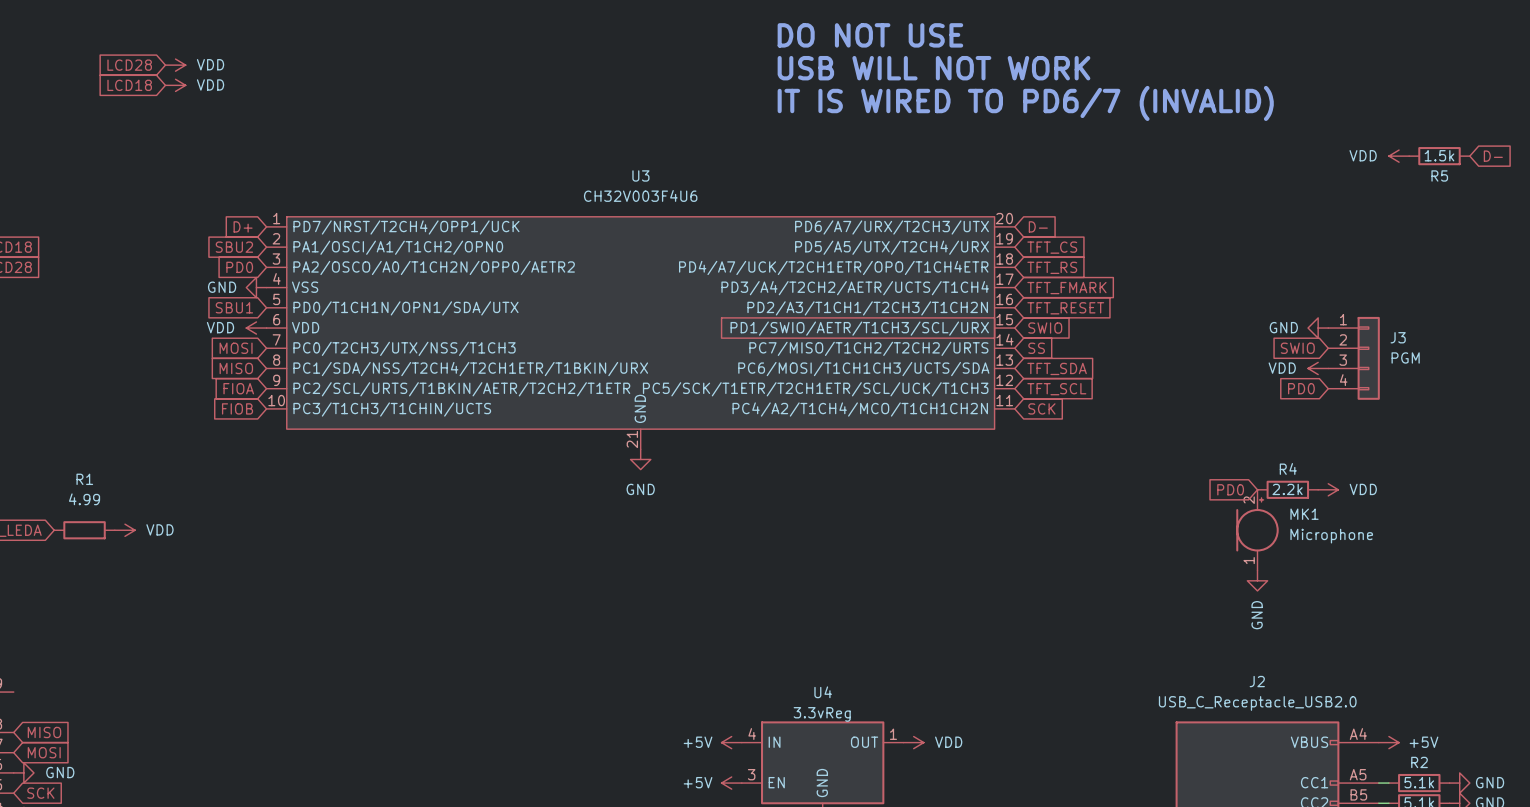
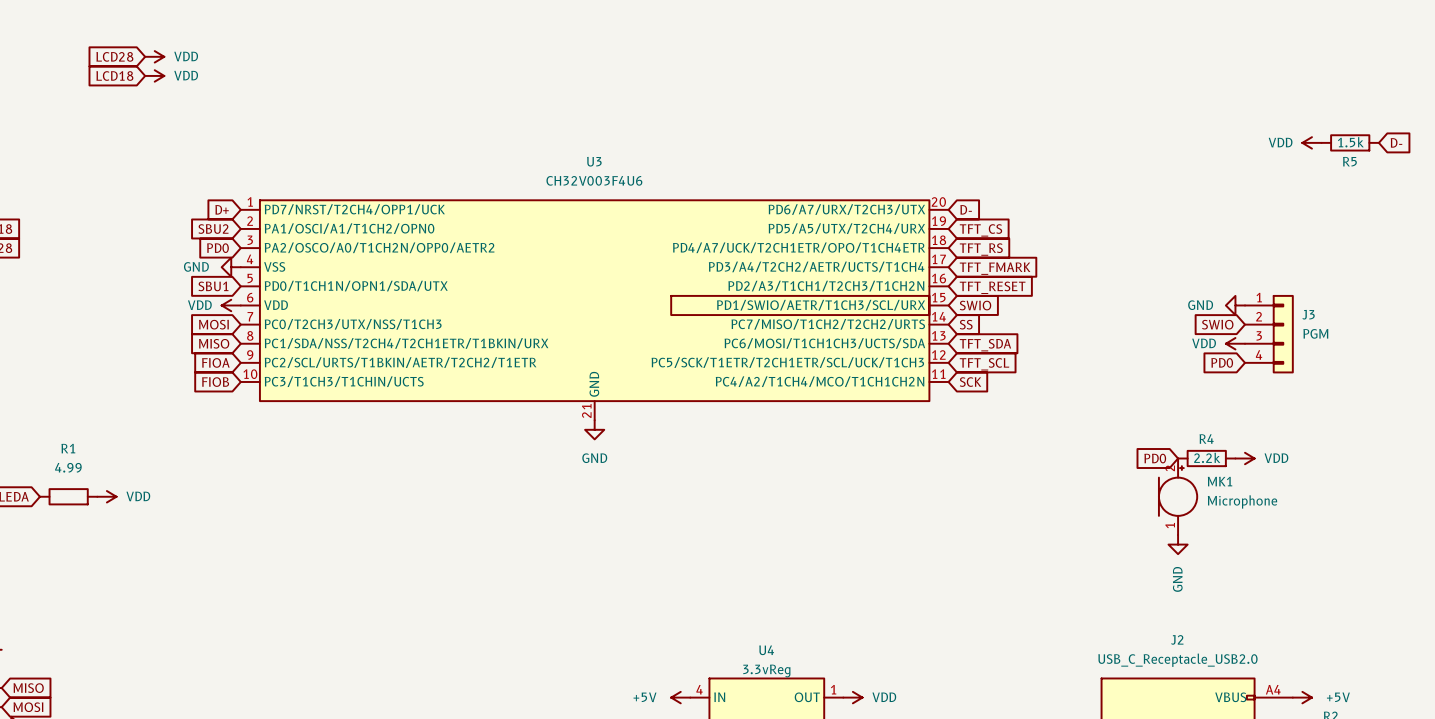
text: DO NOT USE (870, 35) -> none
text: USB WILL NOT WORK (933, 68) -> none
text: IT IS WIRED TO PD6/7 (INVALID) (1025, 103) -> none

